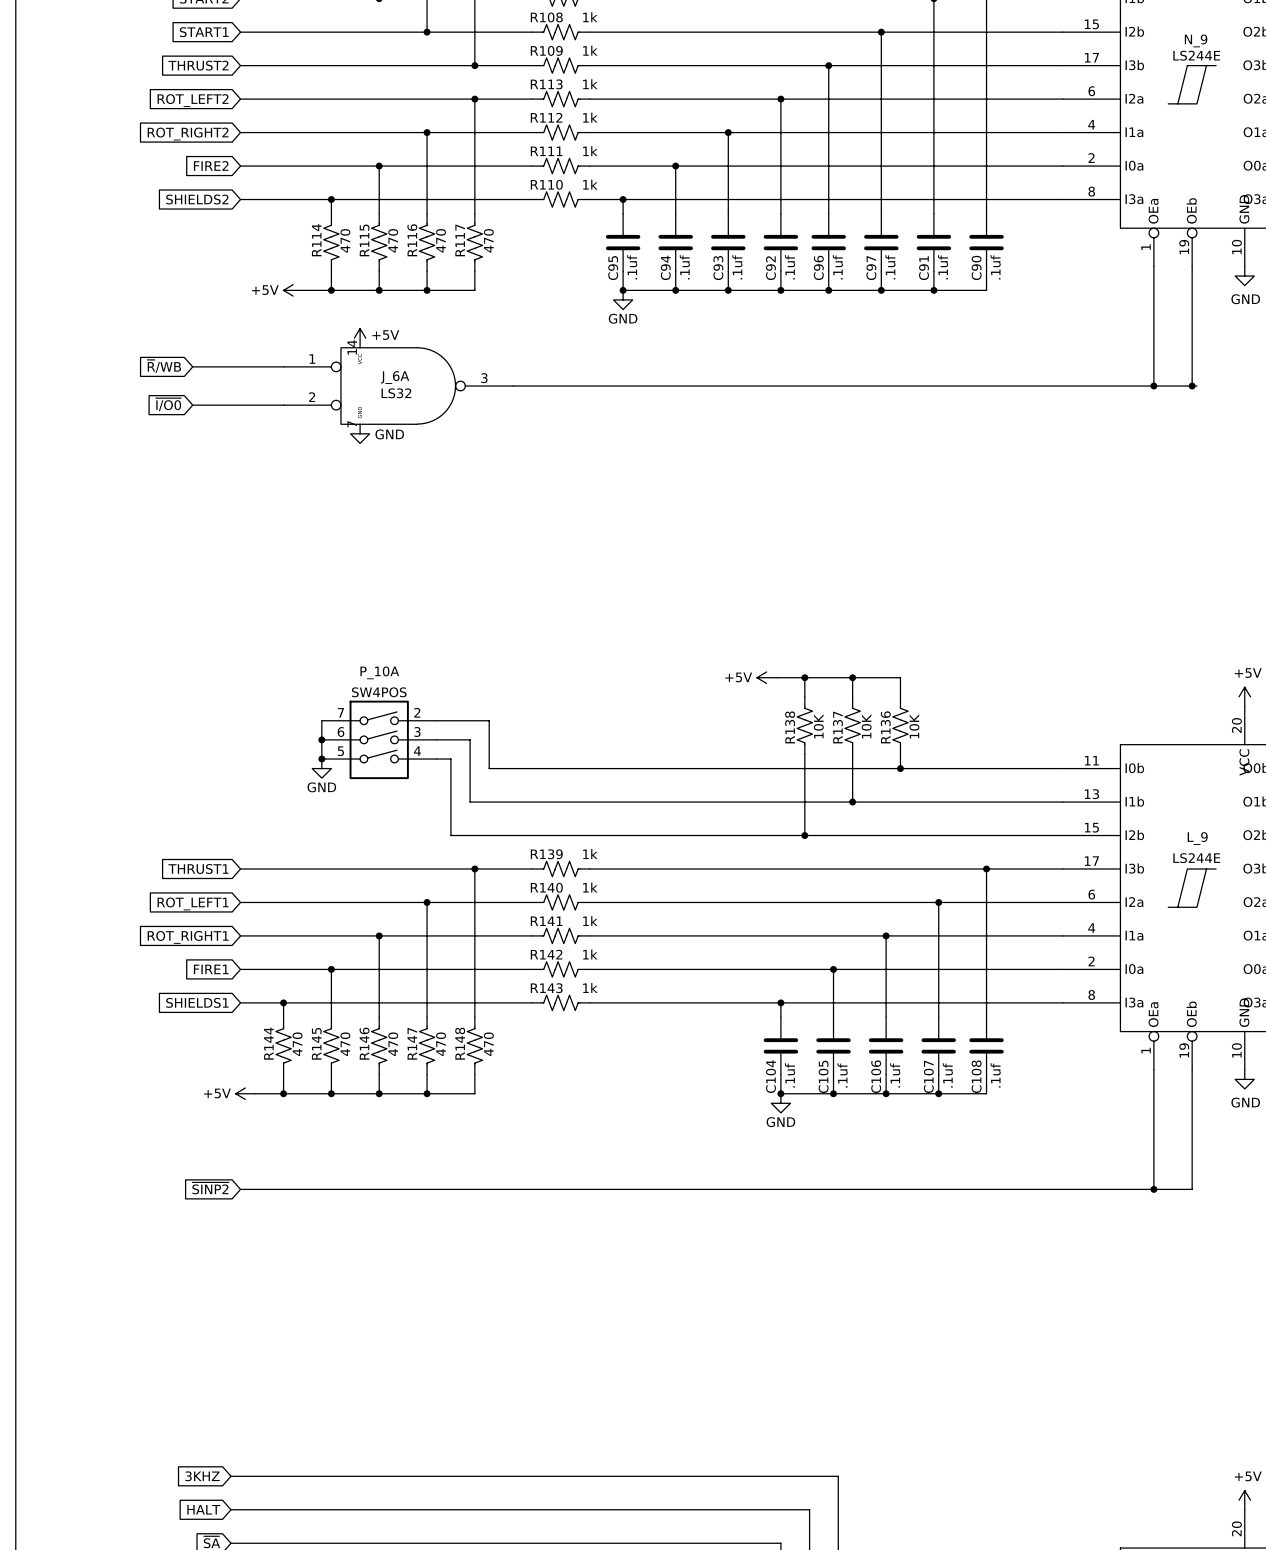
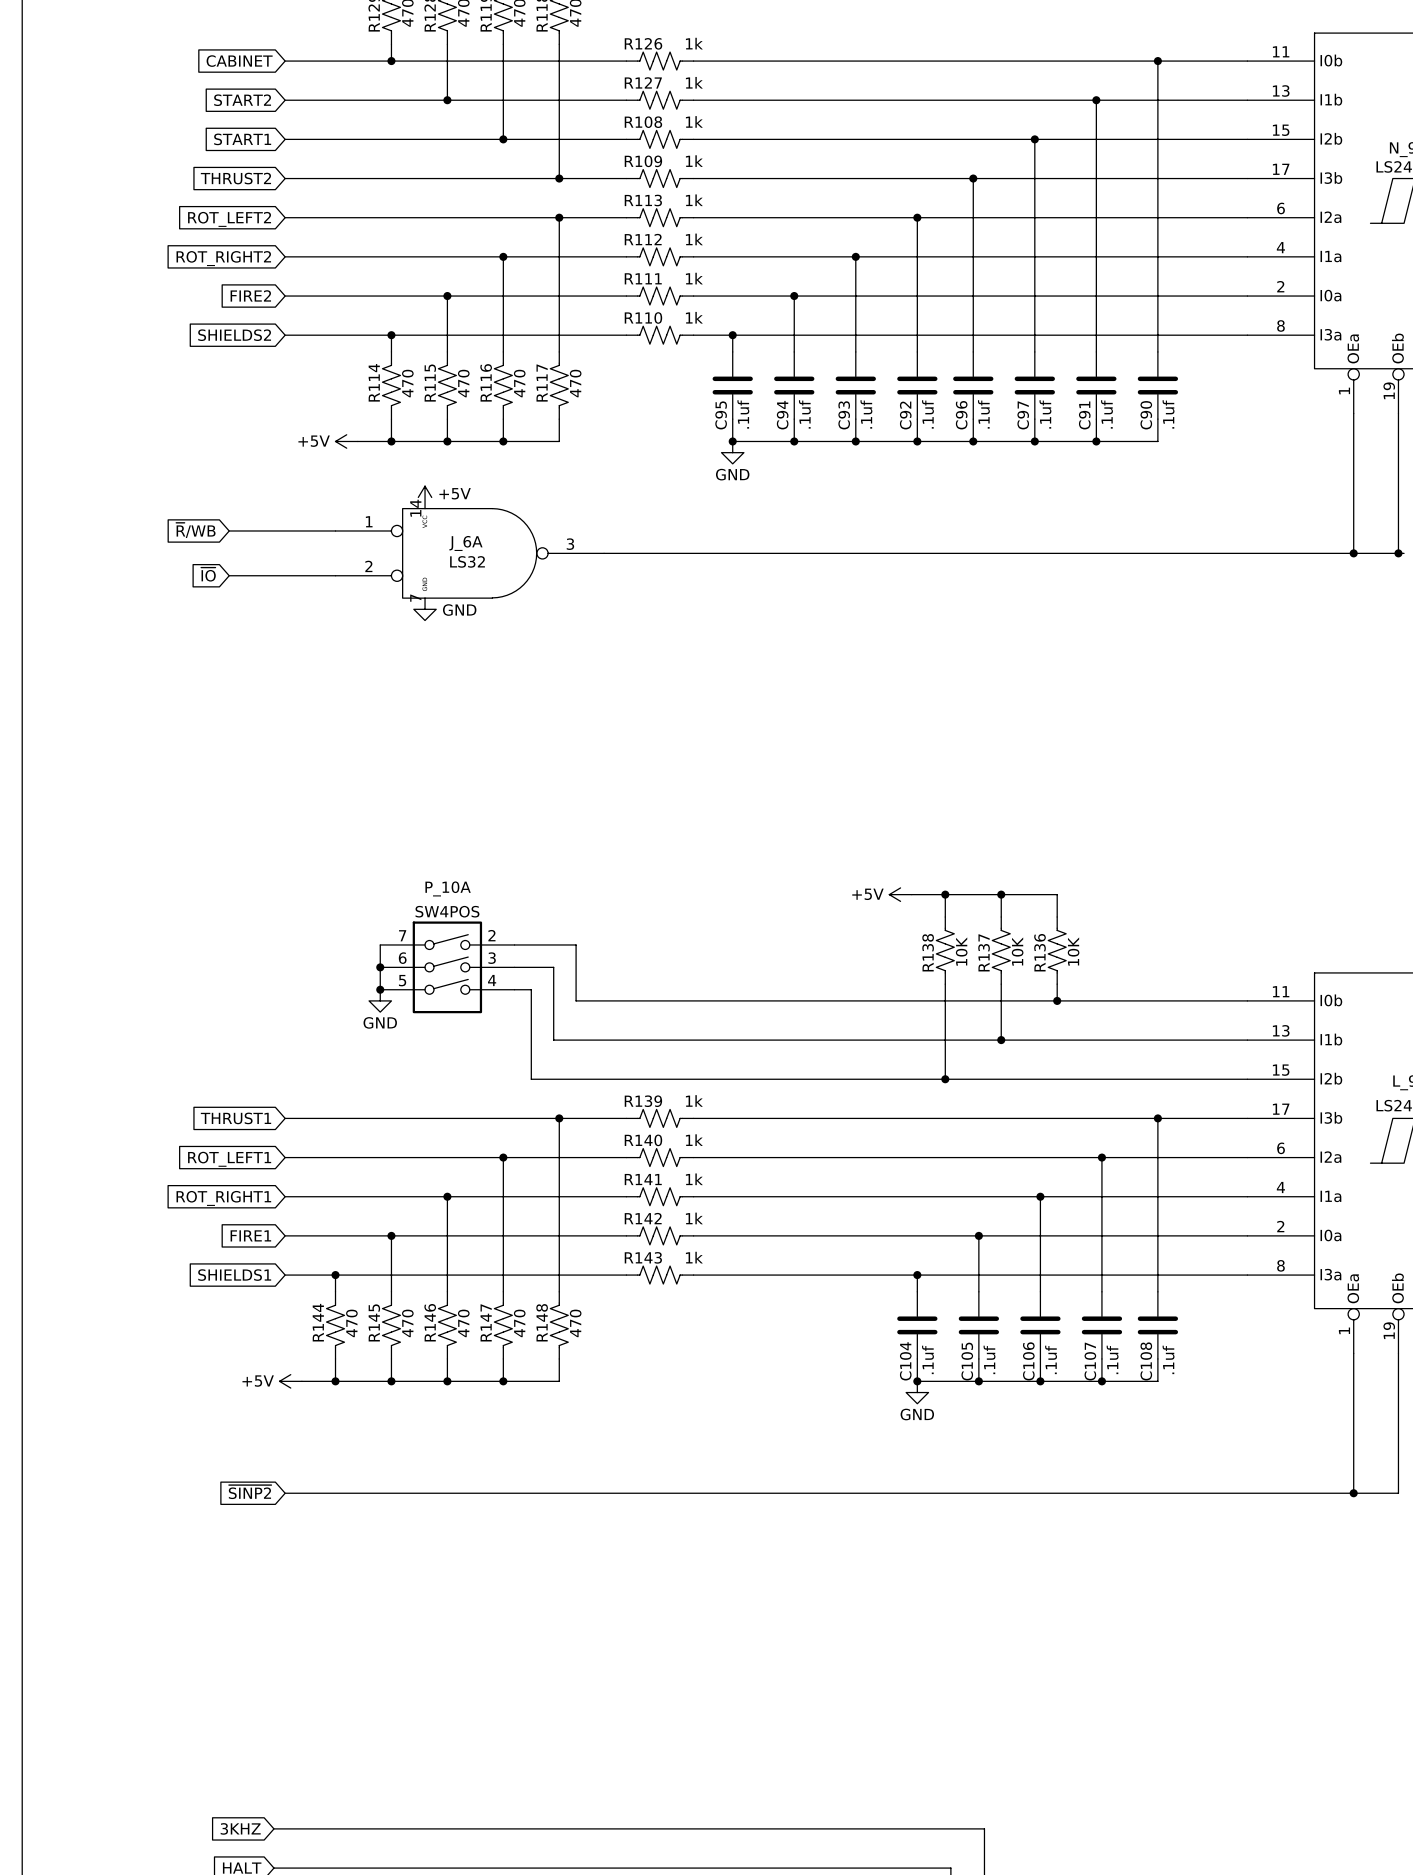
global label: ~{I/O0} (168, 404) -> ~{IO} (208, 574)

